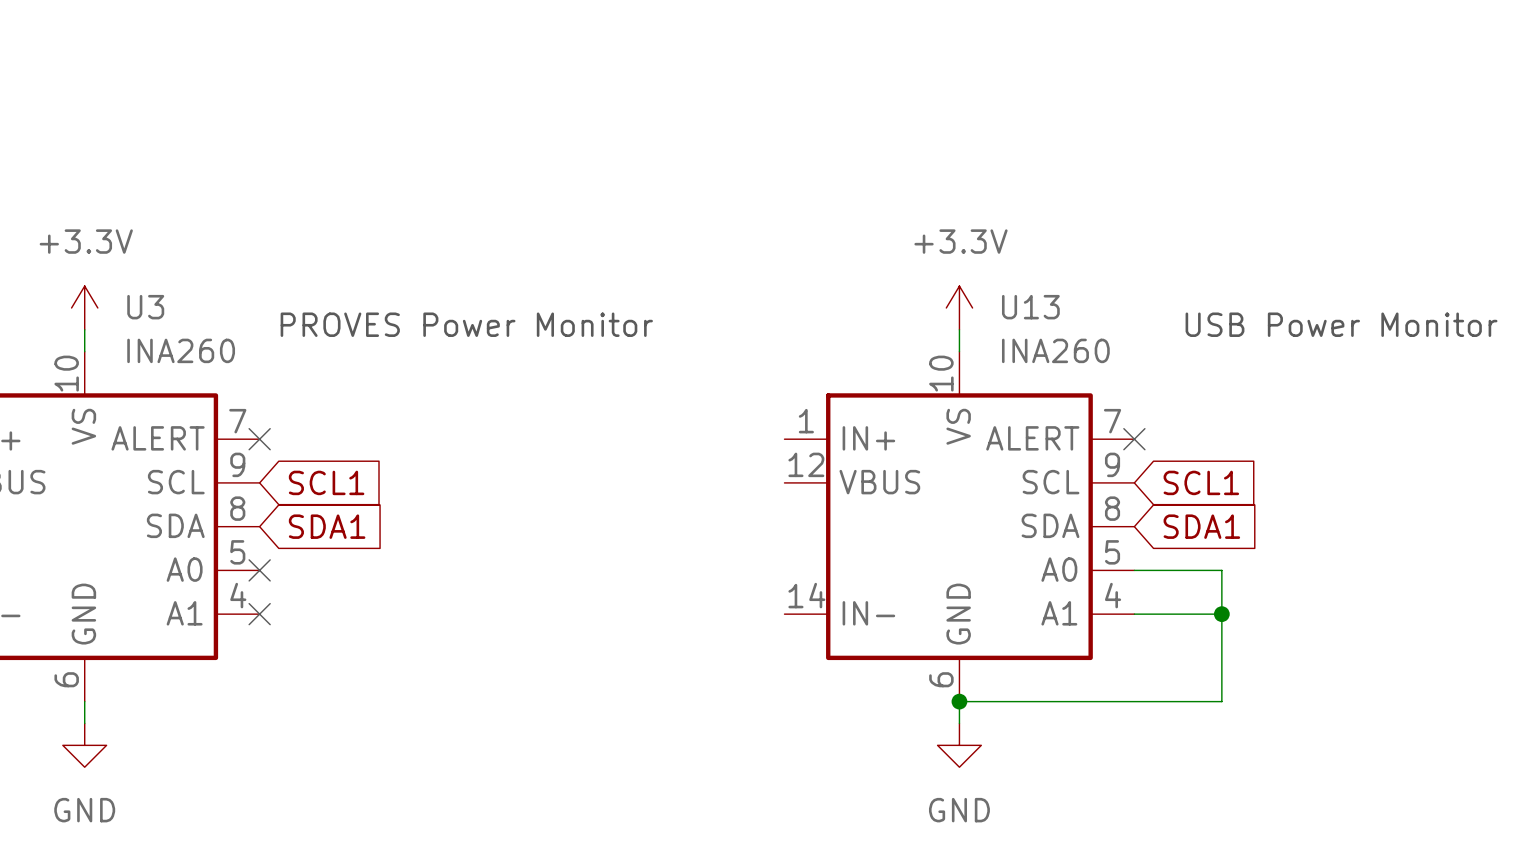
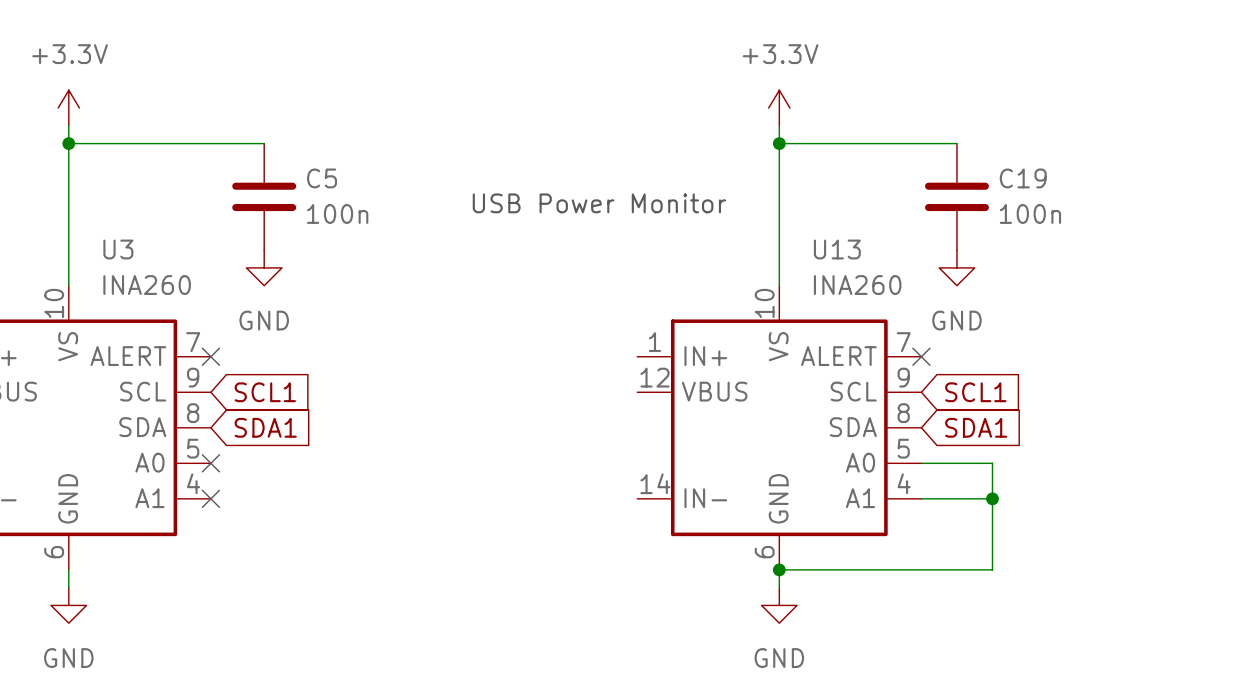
wire: none -> (68, 125) (68, 267)
wire: none -> (779, 125) (779, 267)
wire: none -> (68, 143) (264, 143)
junction: none -> (68, 143)
wire: none -> (779, 143) (956, 143)
junction: none -> (779, 143)
C5: none -> 100n (264, 196)
C19: none -> 100n (956, 196)
text: none -> USB Power Monitor (599, 203)
power symbol position: +3.3V (84, 307) -> +3.3V (68, 108)
power symbol position: +3.3V (959, 307) -> +3.3V (779, 108)
text: PROVES Power Monitor (466, 324) -> none
text: USB Power Monitor (1341, 324) -> none
power symbol: none -> GND (264, 267)
power symbol: none -> GND (956, 267)

